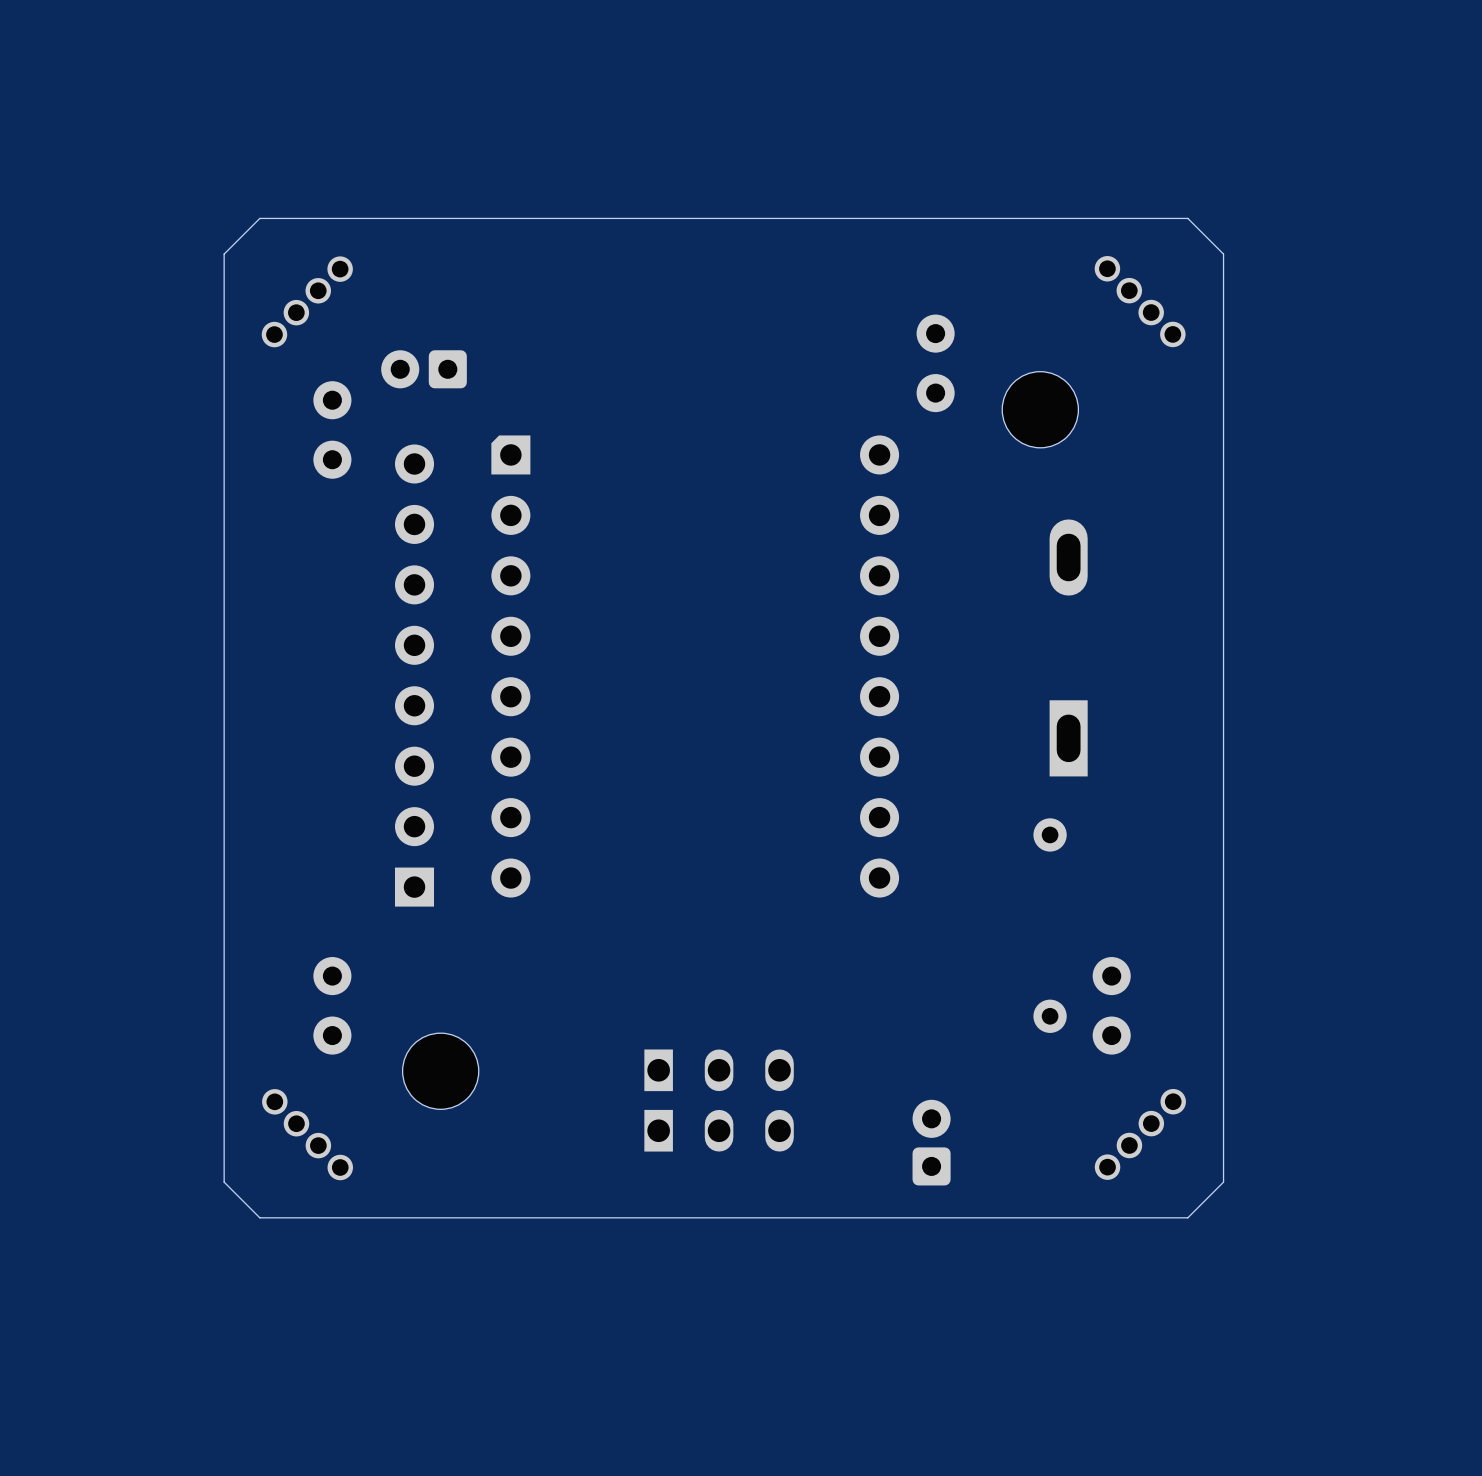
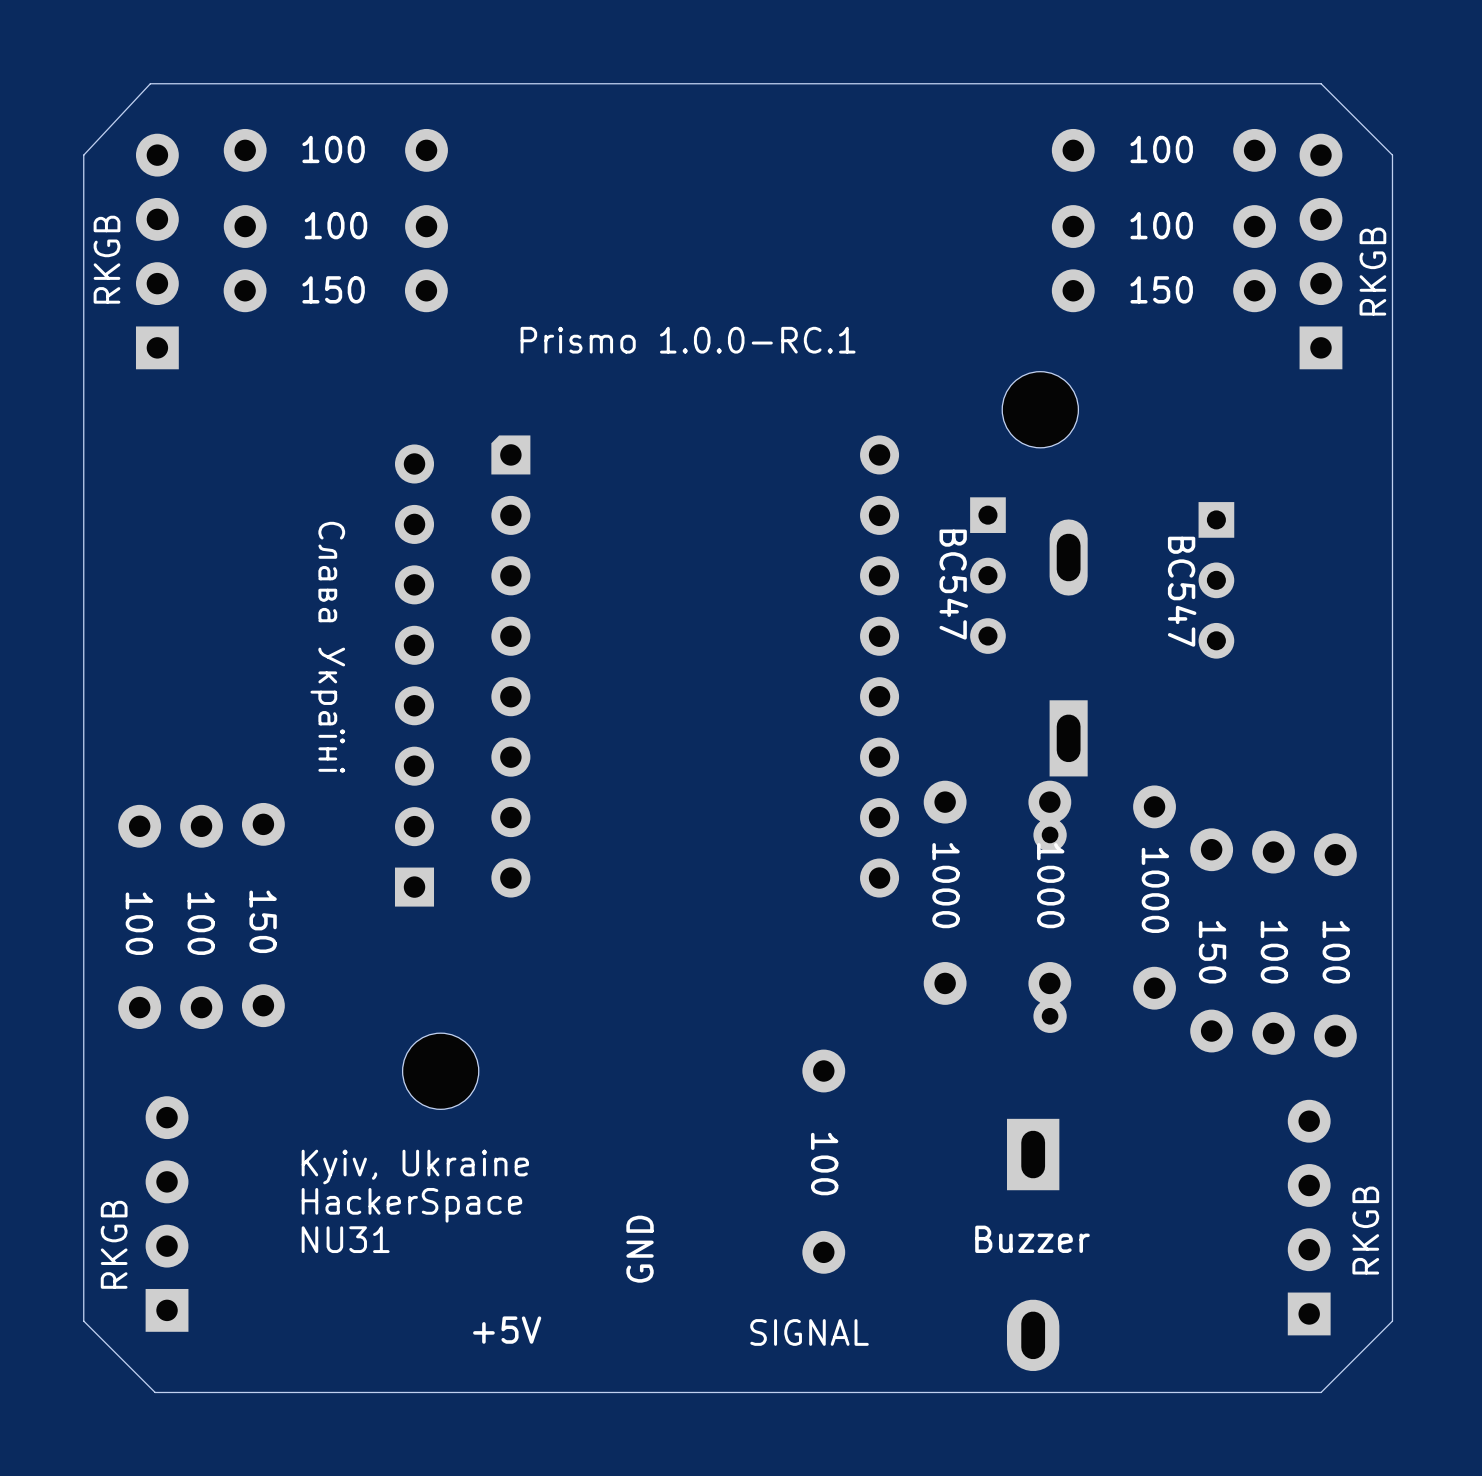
part: none -> 100 (335, 150)
part: none -> 100 (1163, 150)
board edge: (1187, 218) (1223, 254) (1223, 1182) (1187, 1217) (259, 1217) (224, 1182) (224, 254) (259, 218) (1187, 218) -> (1321, 83) (1392, 155) (1392, 1321) (1321, 1392) (155, 1392) (83, 1321) (83, 155) (150, 83) (1321, 83)
part: none -> 100 (335, 226)
part: none -> 100 (1163, 226)
part: none -> (157, 251)
part: none -> (1320, 251)
text: none -> RKGB (107, 259)
text: none -> RKGB (1372, 271)
part: none -> 150 (335, 290)
part: none -> 150 (1163, 290)
part: (307, 301) -> none
part: (1140, 301) -> none
text: none -> Prismo 1.0.0-RC.1 (688, 340)
part: (935, 363) -> none
part: (424, 369) -> none
part: (332, 429) -> none
part: none -> BC547 (987, 575)
part: none -> BC547 (1216, 580)
text: none -> Слава Україні (327, 647)
part: none -> 1000 (945, 892)
part: none -> 1000 (1049, 892)
part: none -> 1000 (1154, 897)
part: none -> 150 (263, 915)
part: none -> 100 (139, 916)
part: none -> 100 (201, 916)
part: none -> 150 (1211, 940)
part: none -> 100 (1273, 942)
part: none -> 100 (1335, 945)
part: (332, 1005) -> none
part: (1111, 1005) -> none
part: (719, 1100) -> none
part: (307, 1134) -> none
part: (1140, 1134) -> none
part: (931, 1142) -> none
part: none -> 100 (823, 1161)
text: none -> Kyiv, Ukraine (415, 1167)
text: none -> HackerSpace (411, 1205)
part: none -> (167, 1214)
part: none -> (1309, 1217)
text: none -> RKGB (1365, 1230)
text: none -> NU31 (345, 1239)
text: none -> RKGB (114, 1244)
part: none -> Buzzer (1033, 1244)
text: none -> GND (640, 1249)
text: none -> +5V (507, 1330)
text: none -> SIGNAL (809, 1332)

